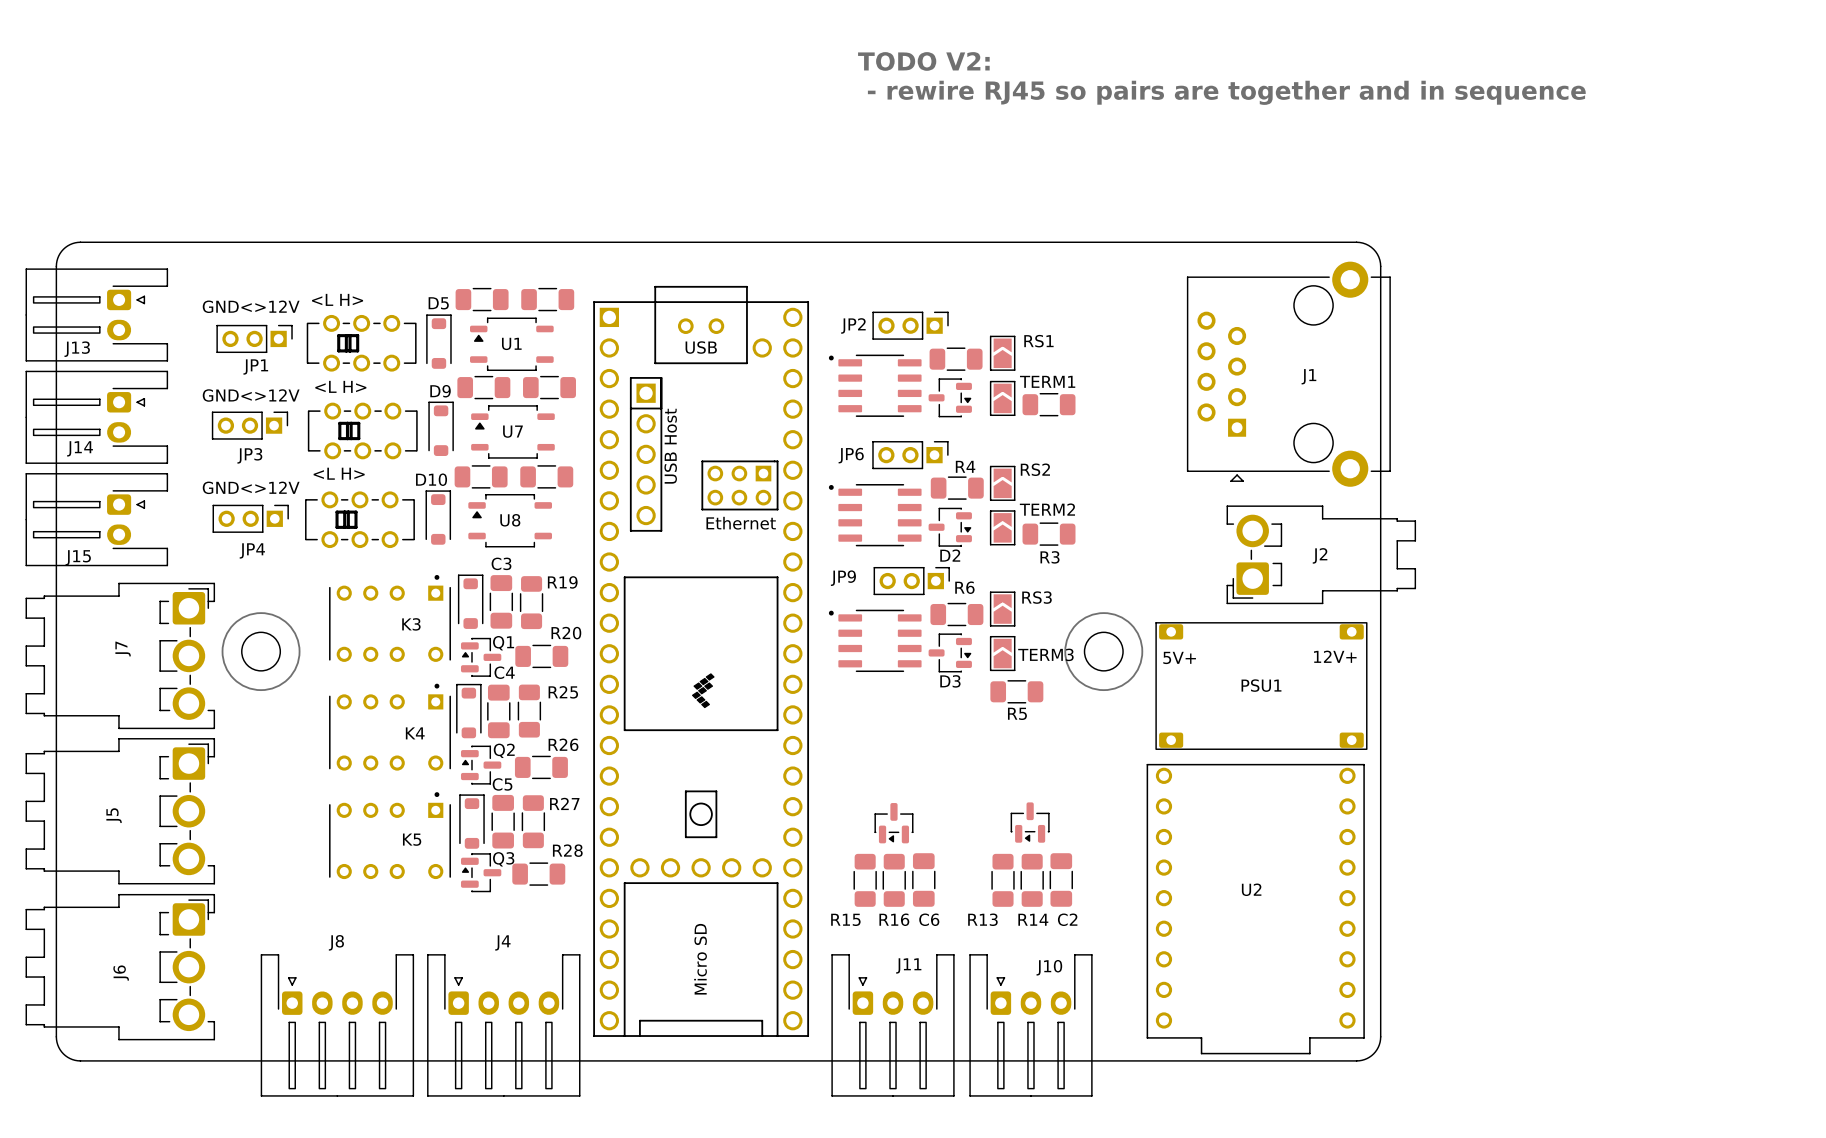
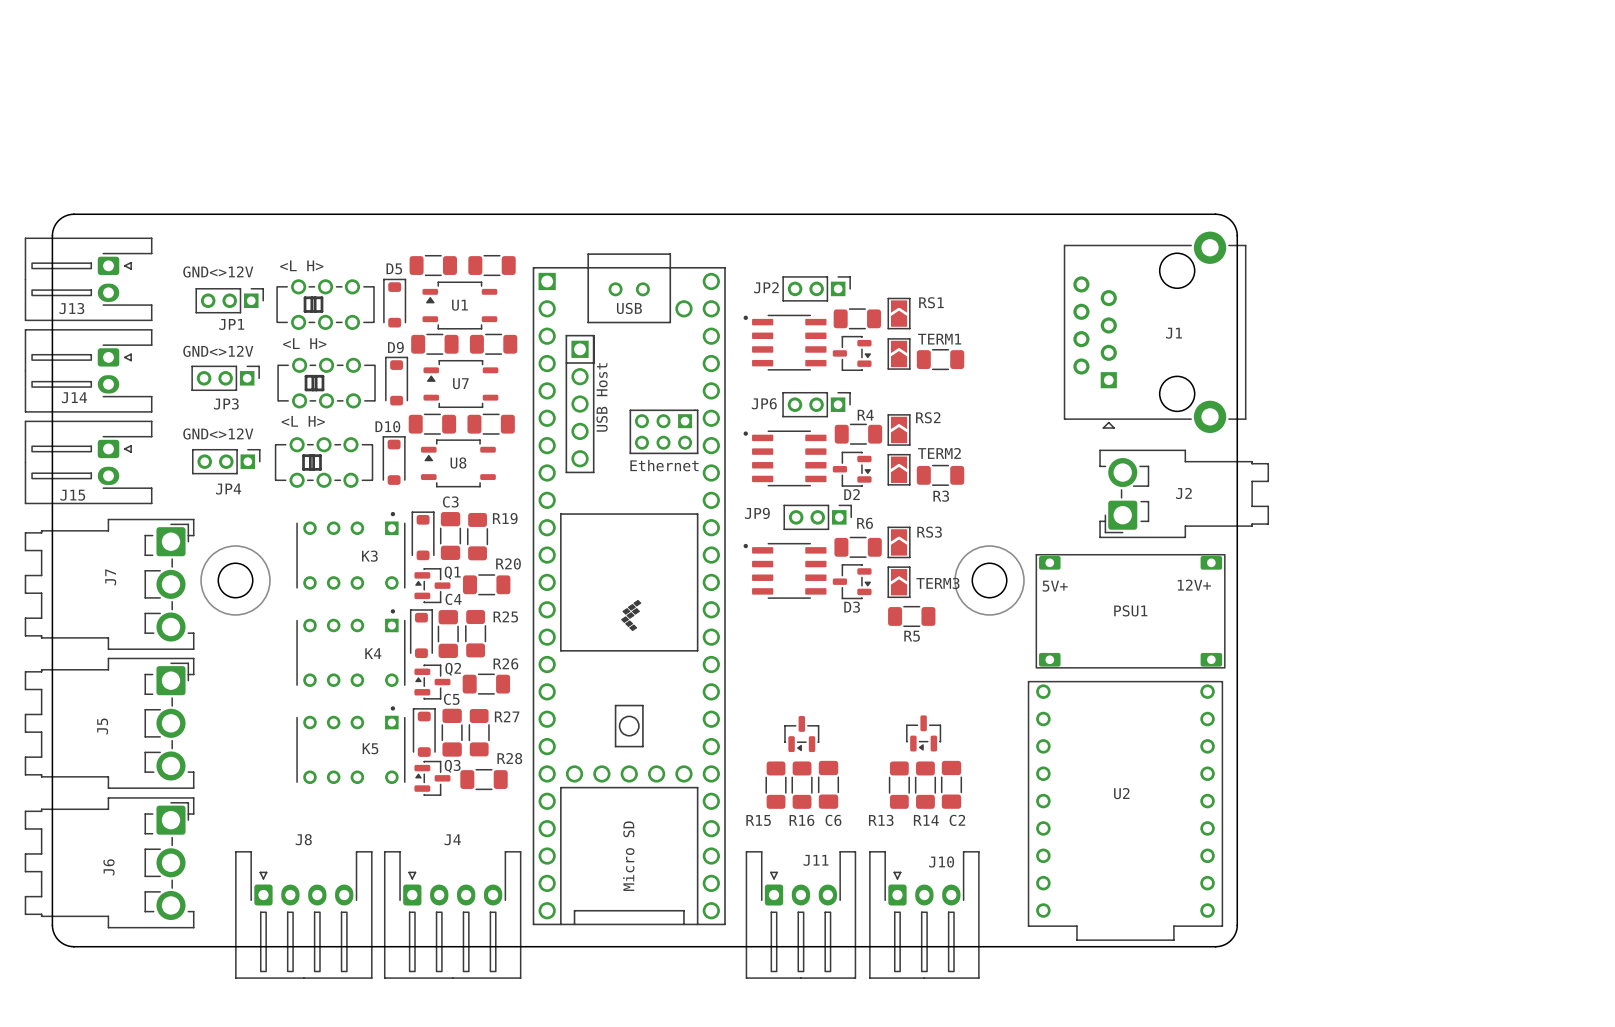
text: TODO V2: (923, 61) -> none
text: - rewire RJ45 so pairs are together and in sequence (1226, 92) -> none

